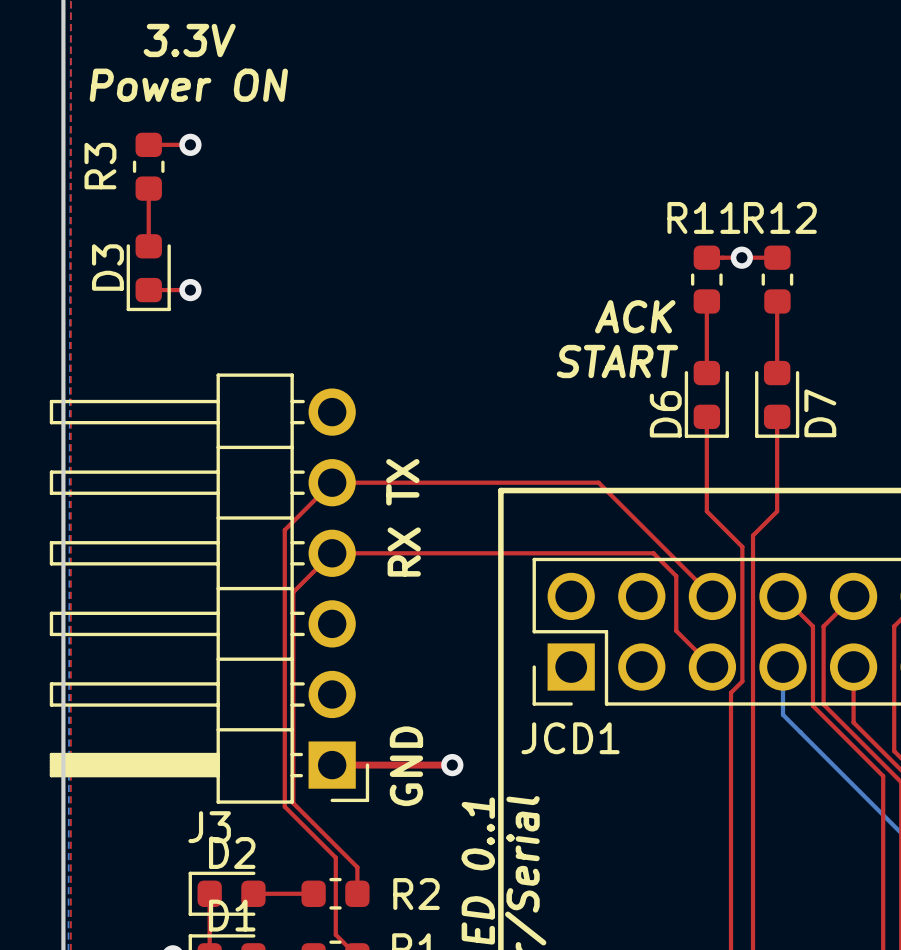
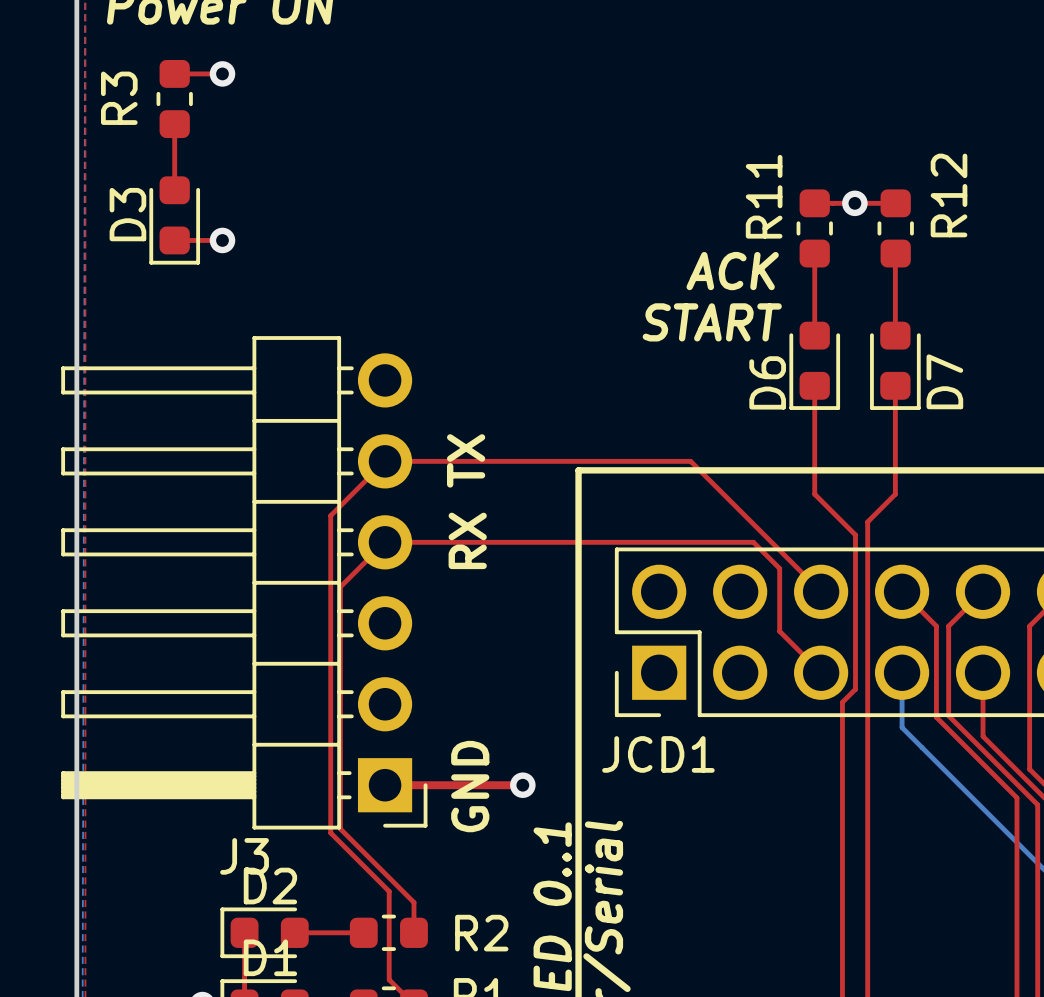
R11 name rotation: 0° (703, 217) -> 90° counterclockwise (764, 196)
R12 name rotation: 0° (780, 217) -> 90° counterclockwise (949, 195)

